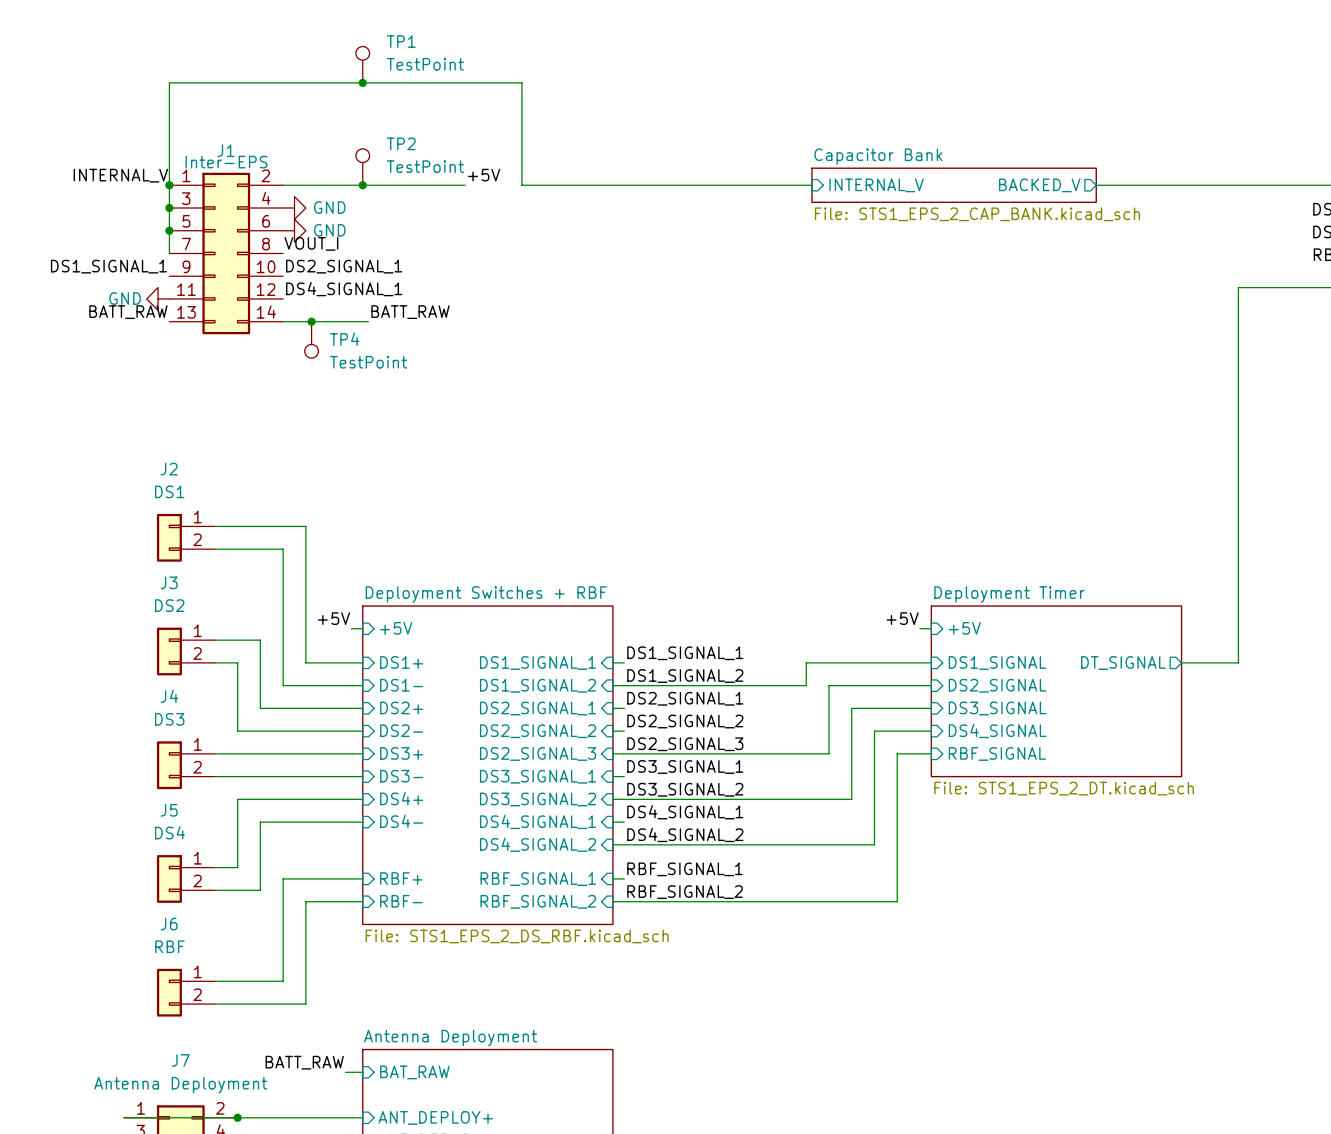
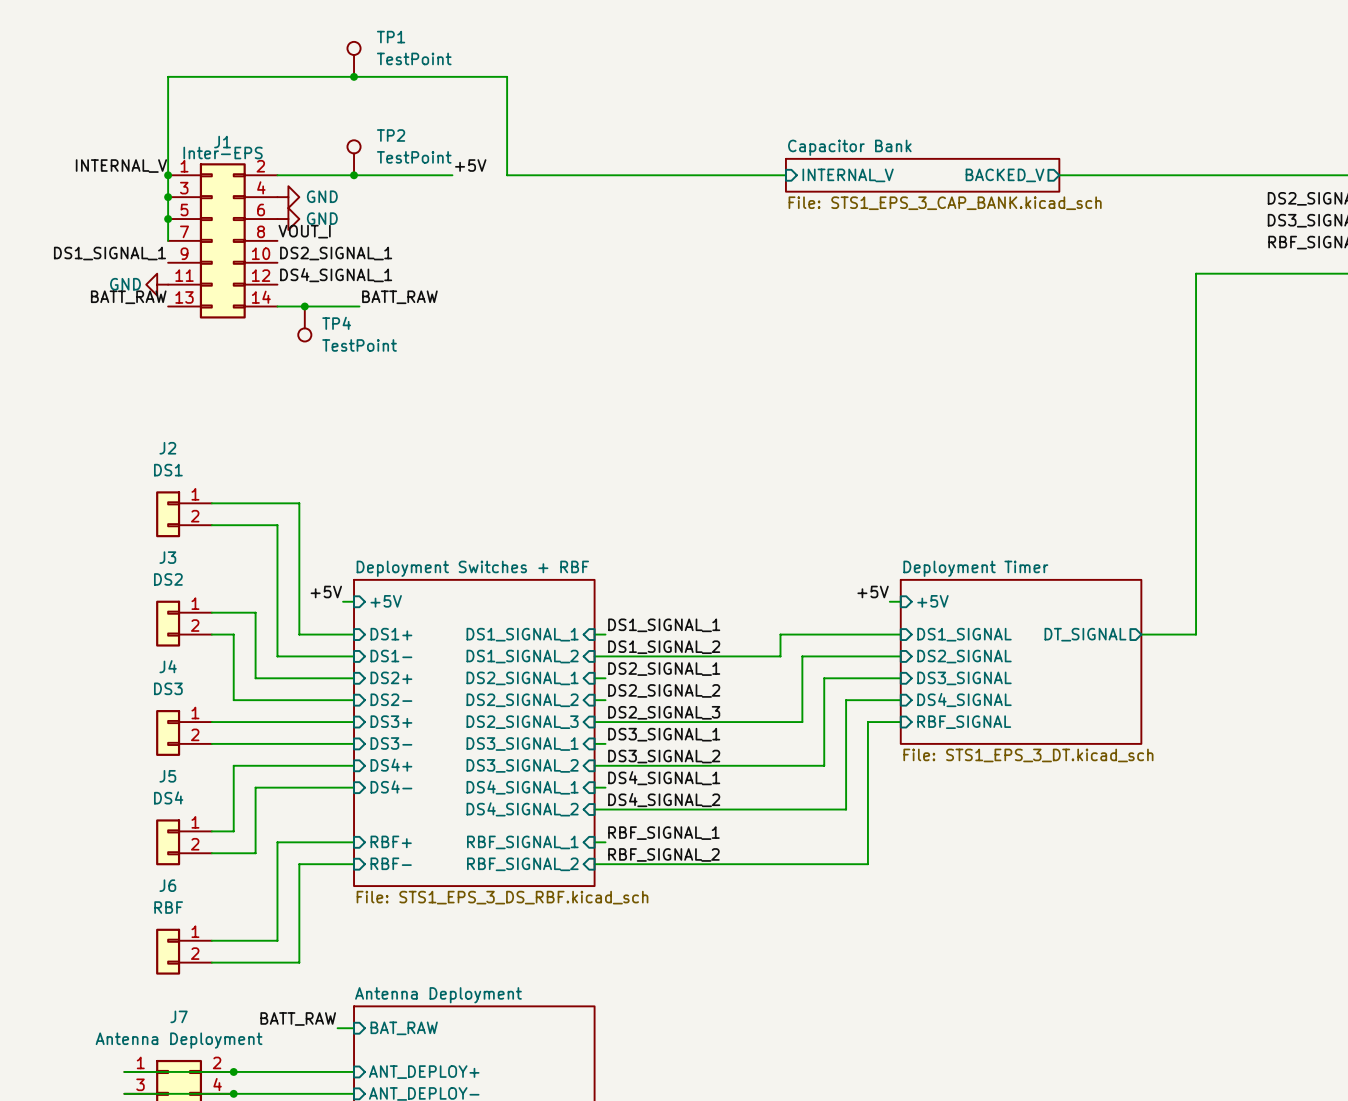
sheet Capacitor Bank value: File: STS1_EPS_2_CAP_BANK.kicad_sch (977, 214) -> File: STS1_EPS_3_CAP_BANK.kicad_sch (945, 203)
sheet Deployment Timer value: File: STS1_EPS_2_DT.kicad_sch (1064, 788) -> File: STS1_EPS_3_DT.kicad_sch (1028, 755)
sheet Deployment Switches + RBF value: File: STS1_EPS_2_DS_RBF.kicad_sch (517, 936) -> File: STS1_EPS_3_DS_RBF.kicad_sch (502, 897)

